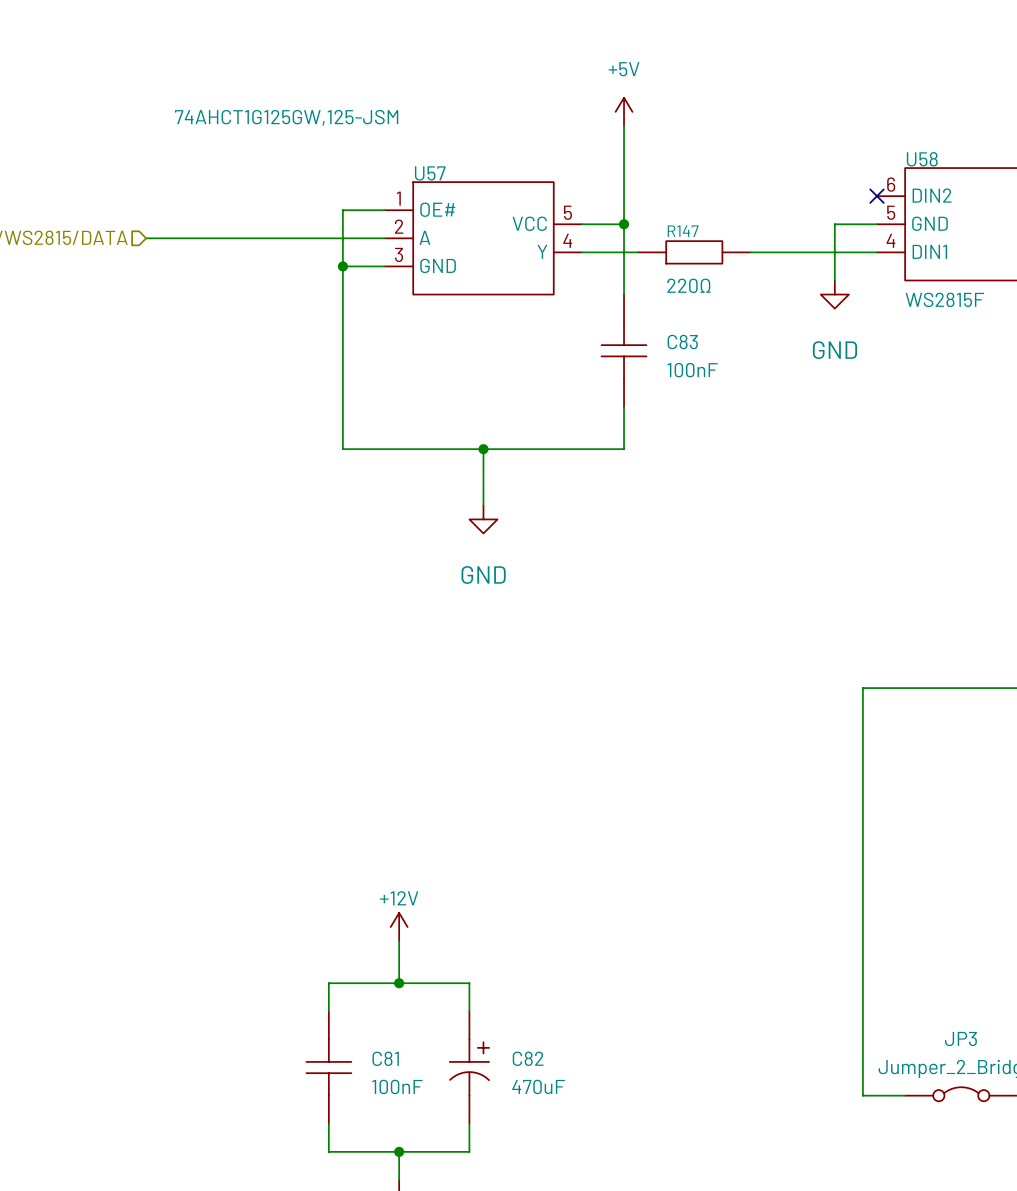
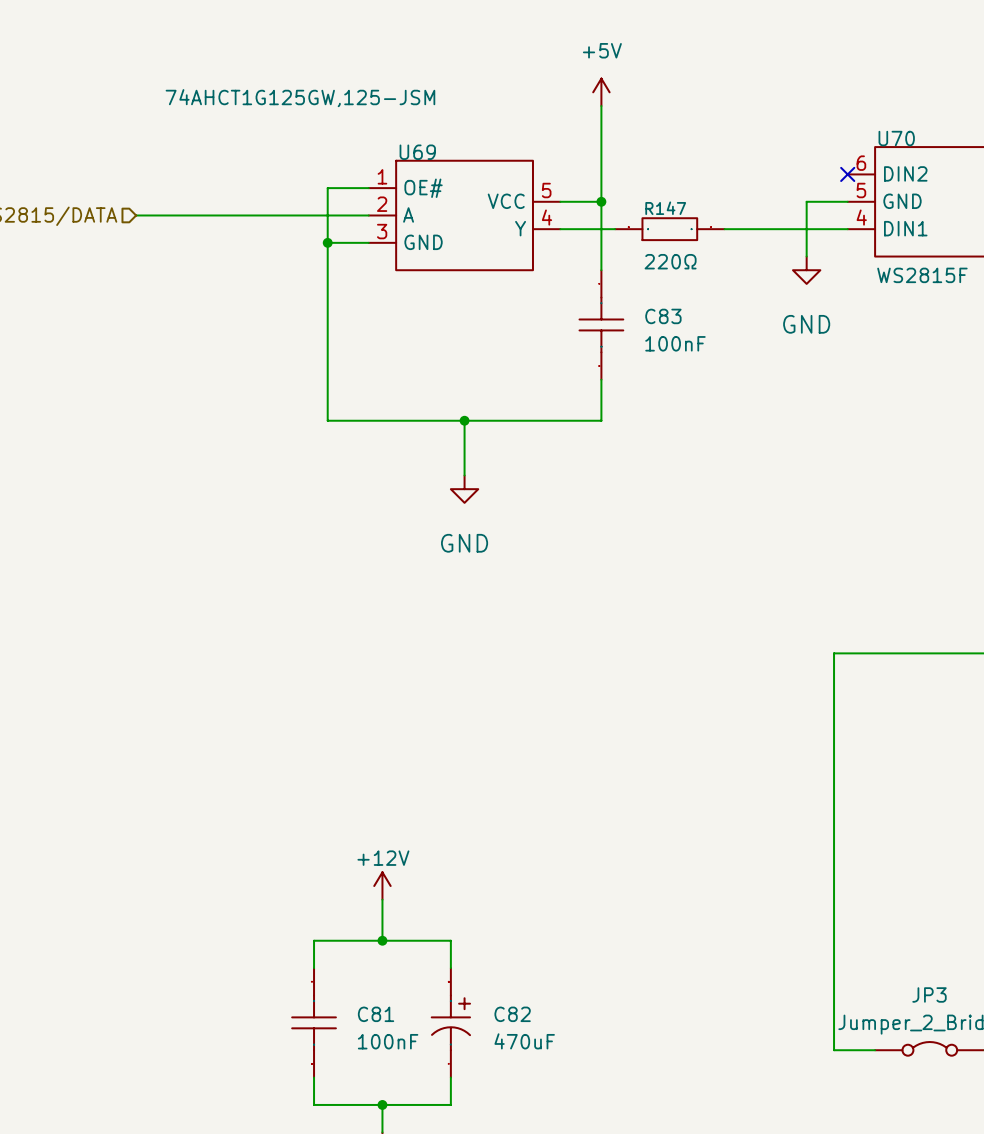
U58 name: U58 (922, 159) -> U70 (896, 138)
U57 name: U57 (430, 173) -> U69 (417, 152)

